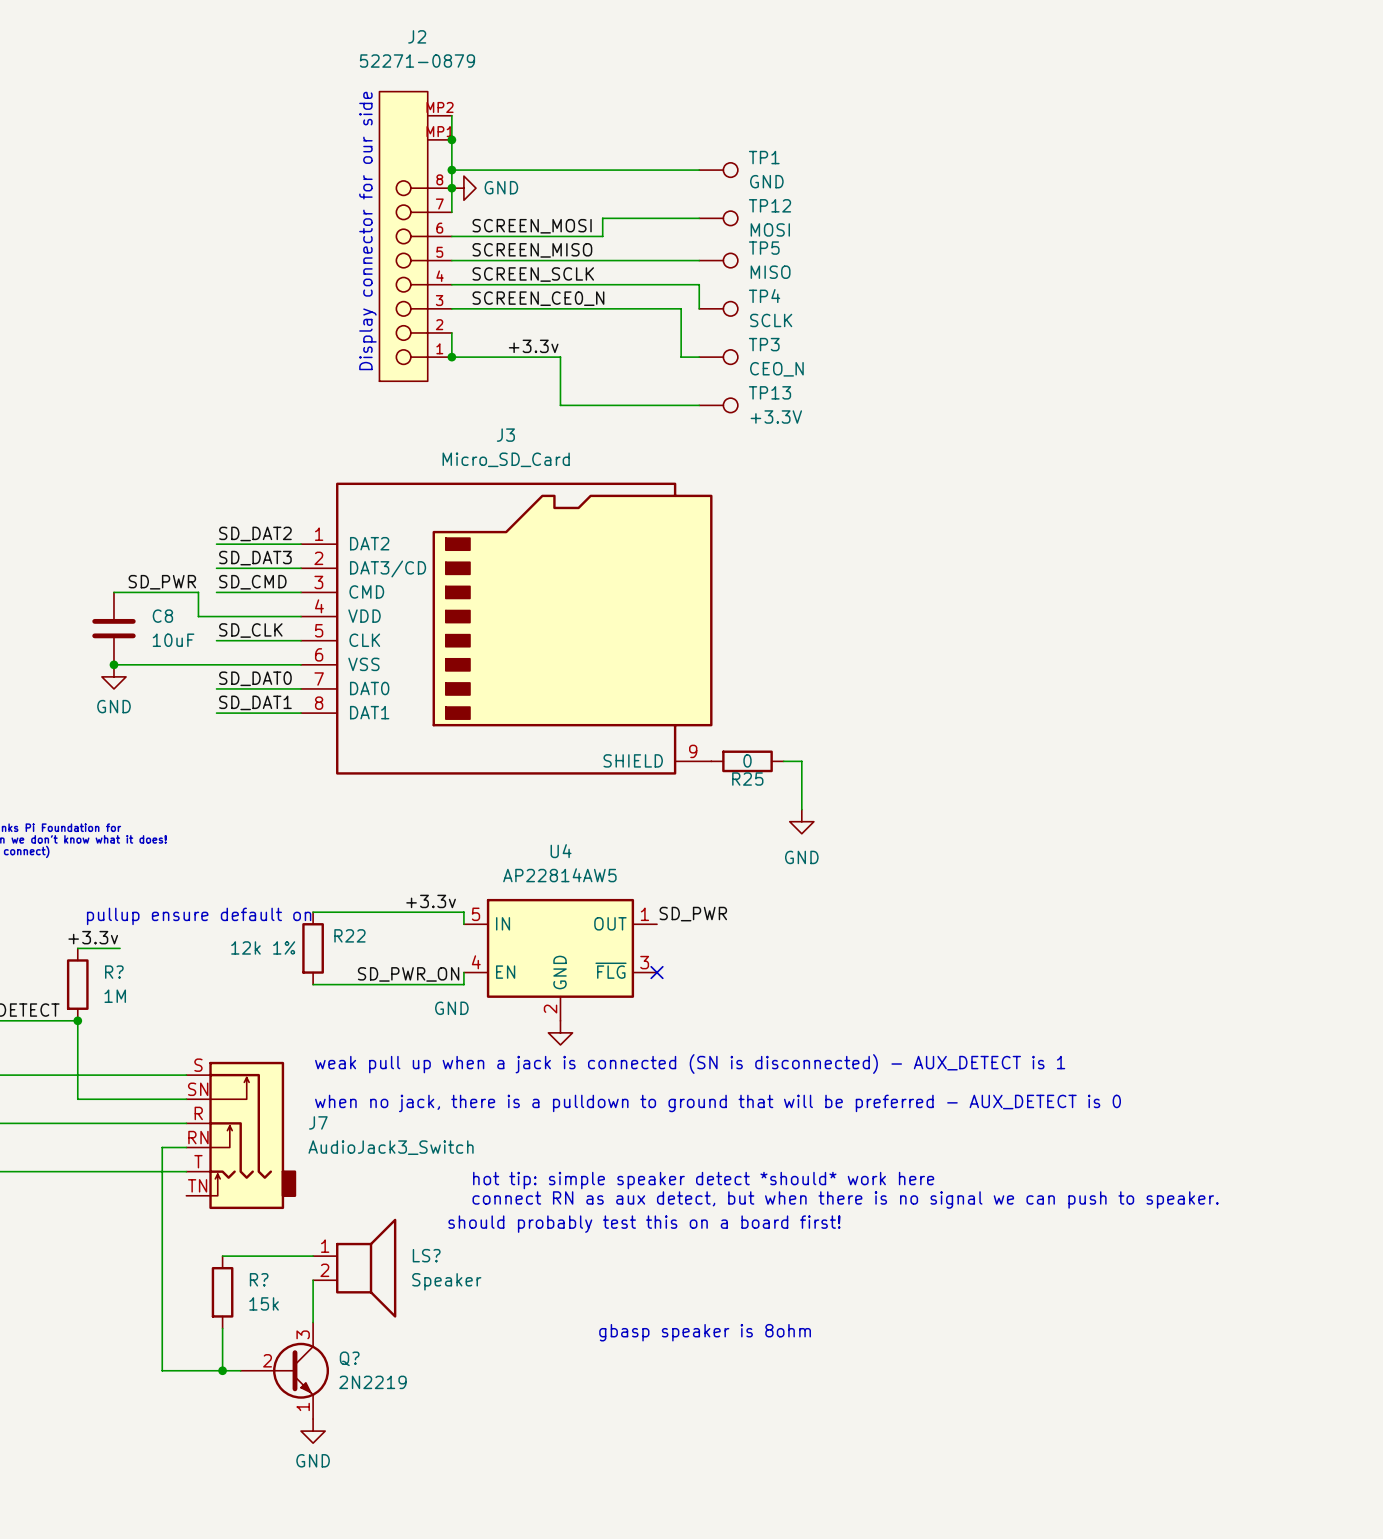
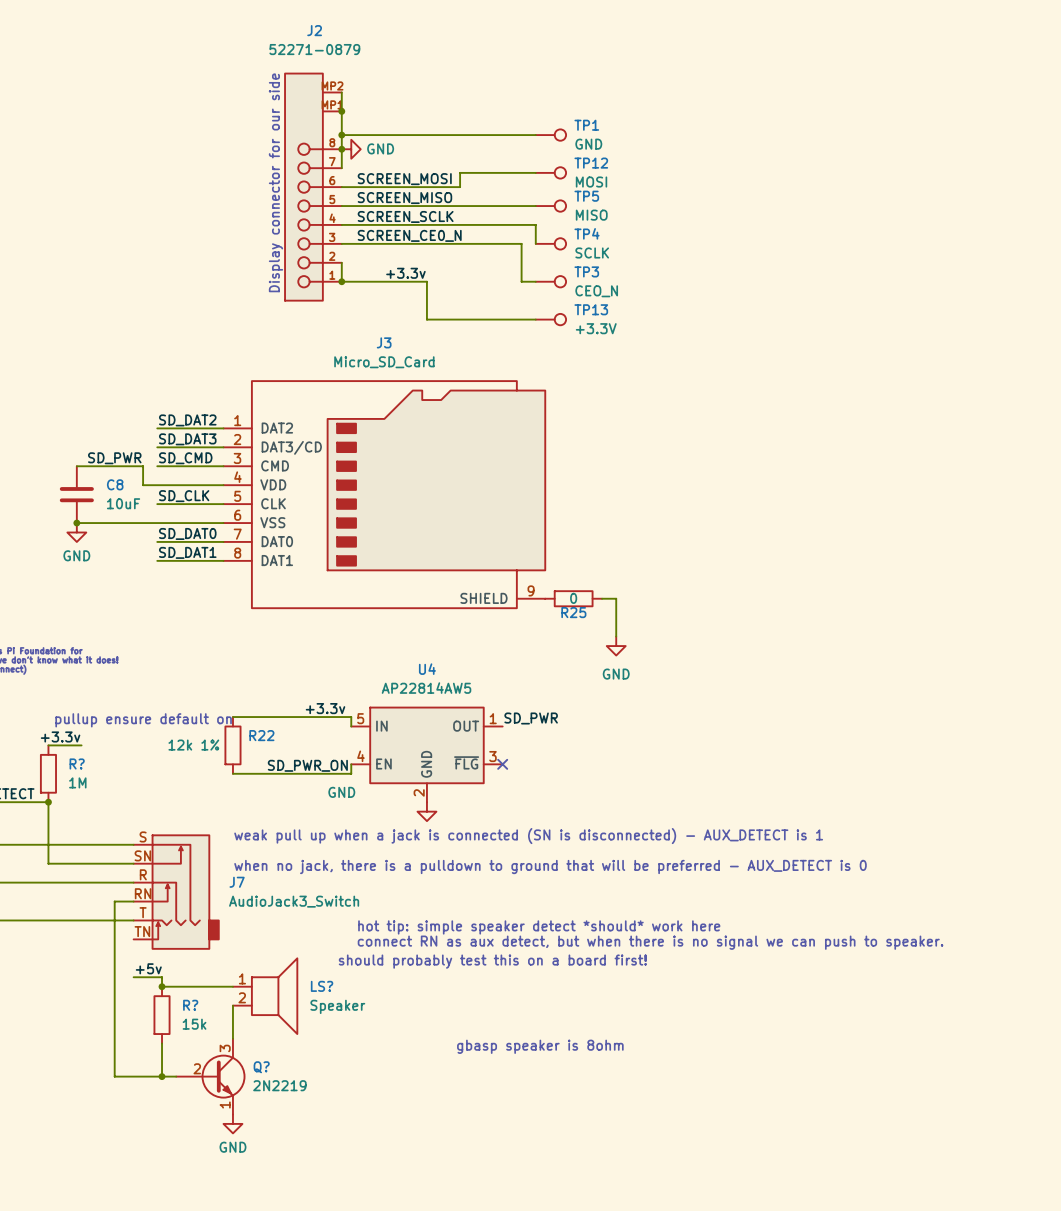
label: none -> +5v (148, 968)
wire: none -> (133, 977) (162, 977) (162, 986)
junction: none -> (162, 986)

